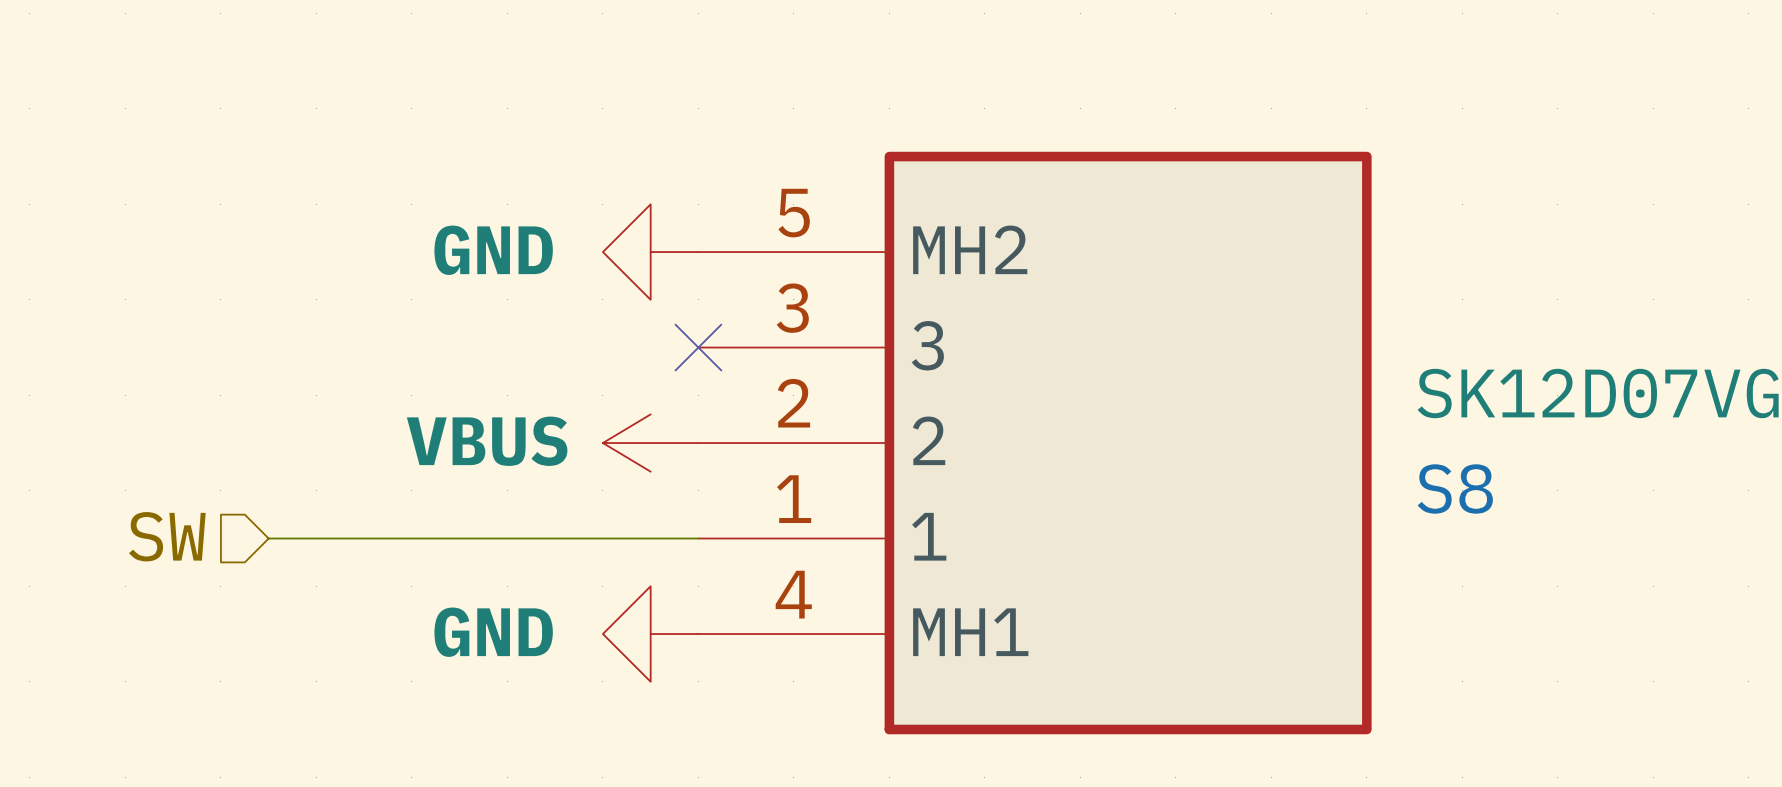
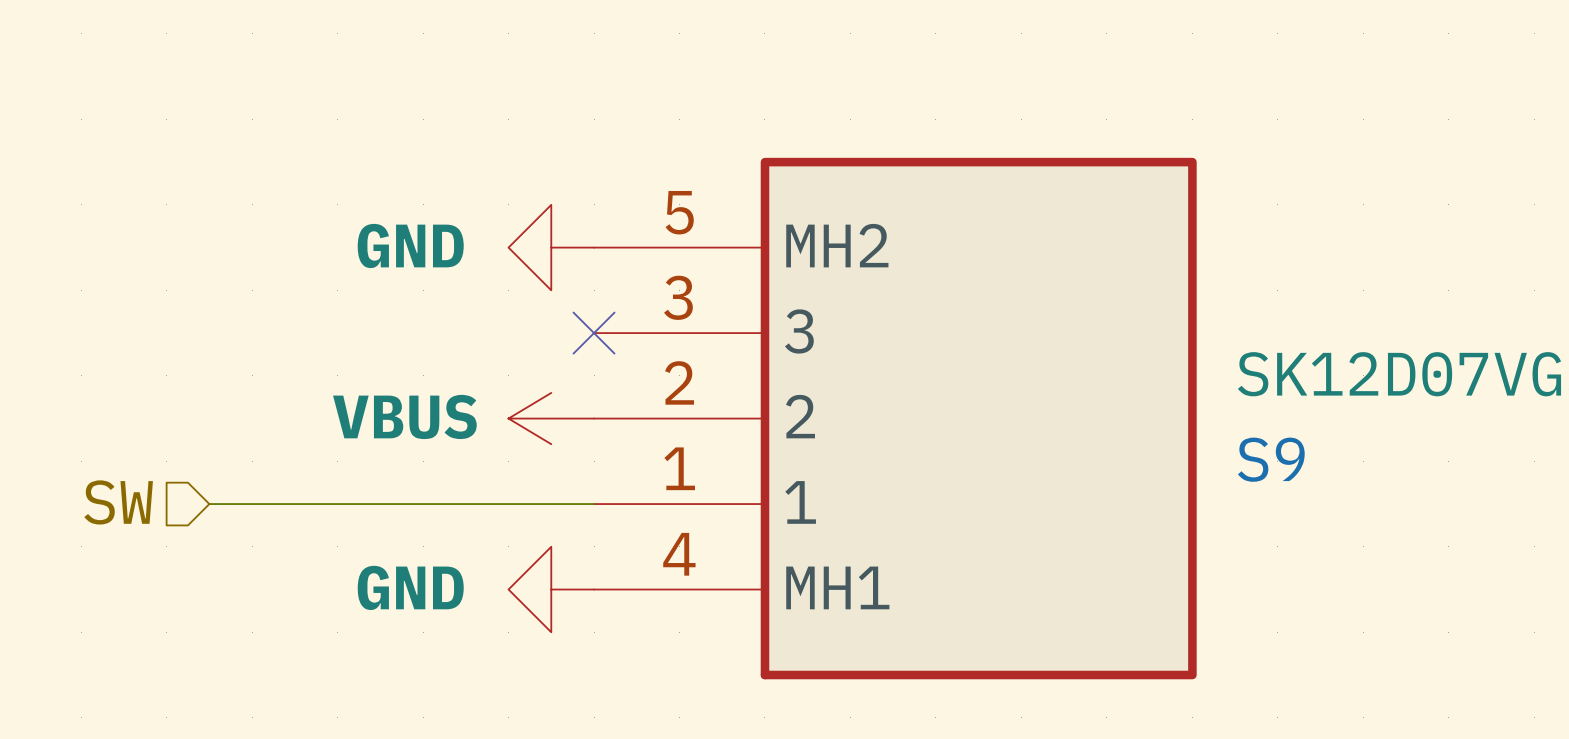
S8 name: S8 (1455, 488) -> S9 (1271, 459)

